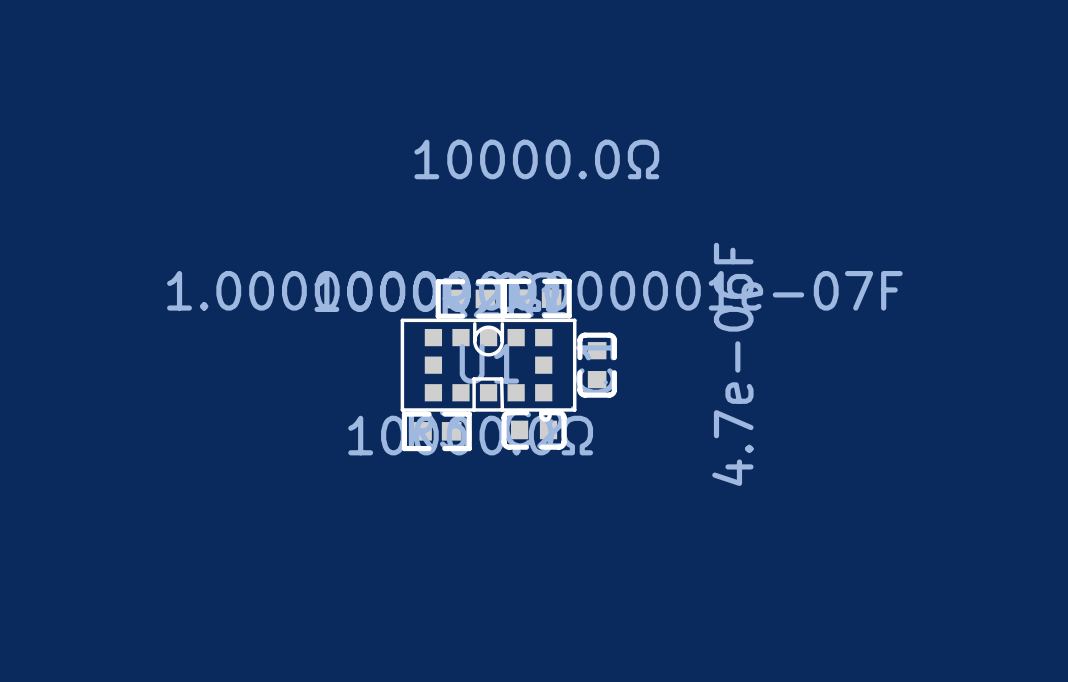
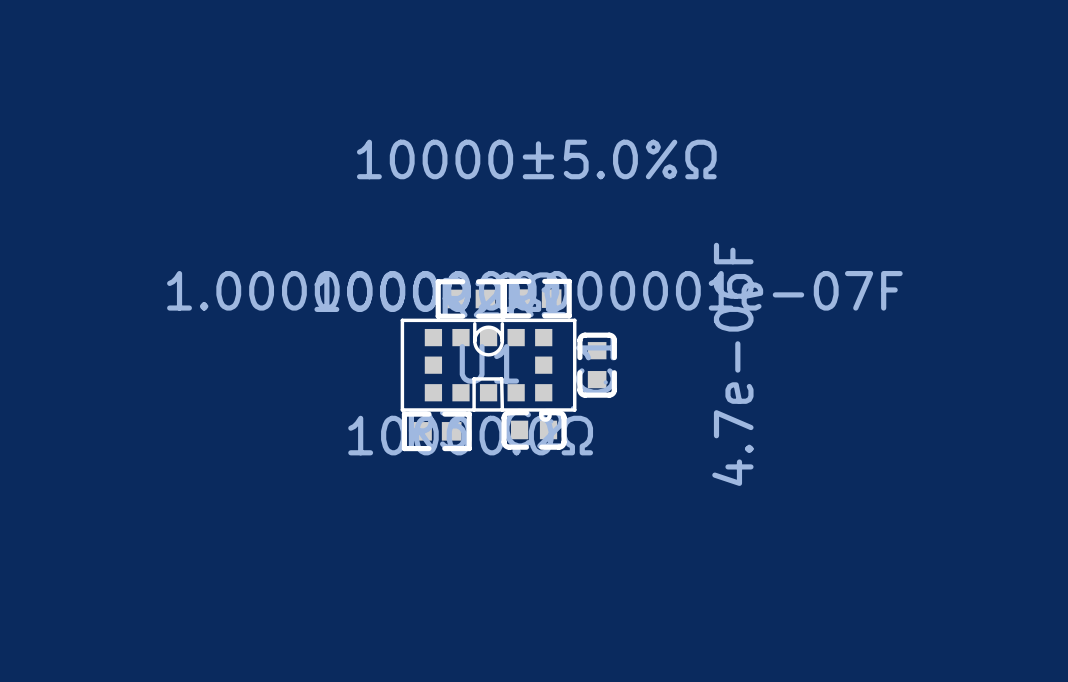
part value: 10000.0Ω (536, 159) -> 10000±5.0%Ω (536, 159)

